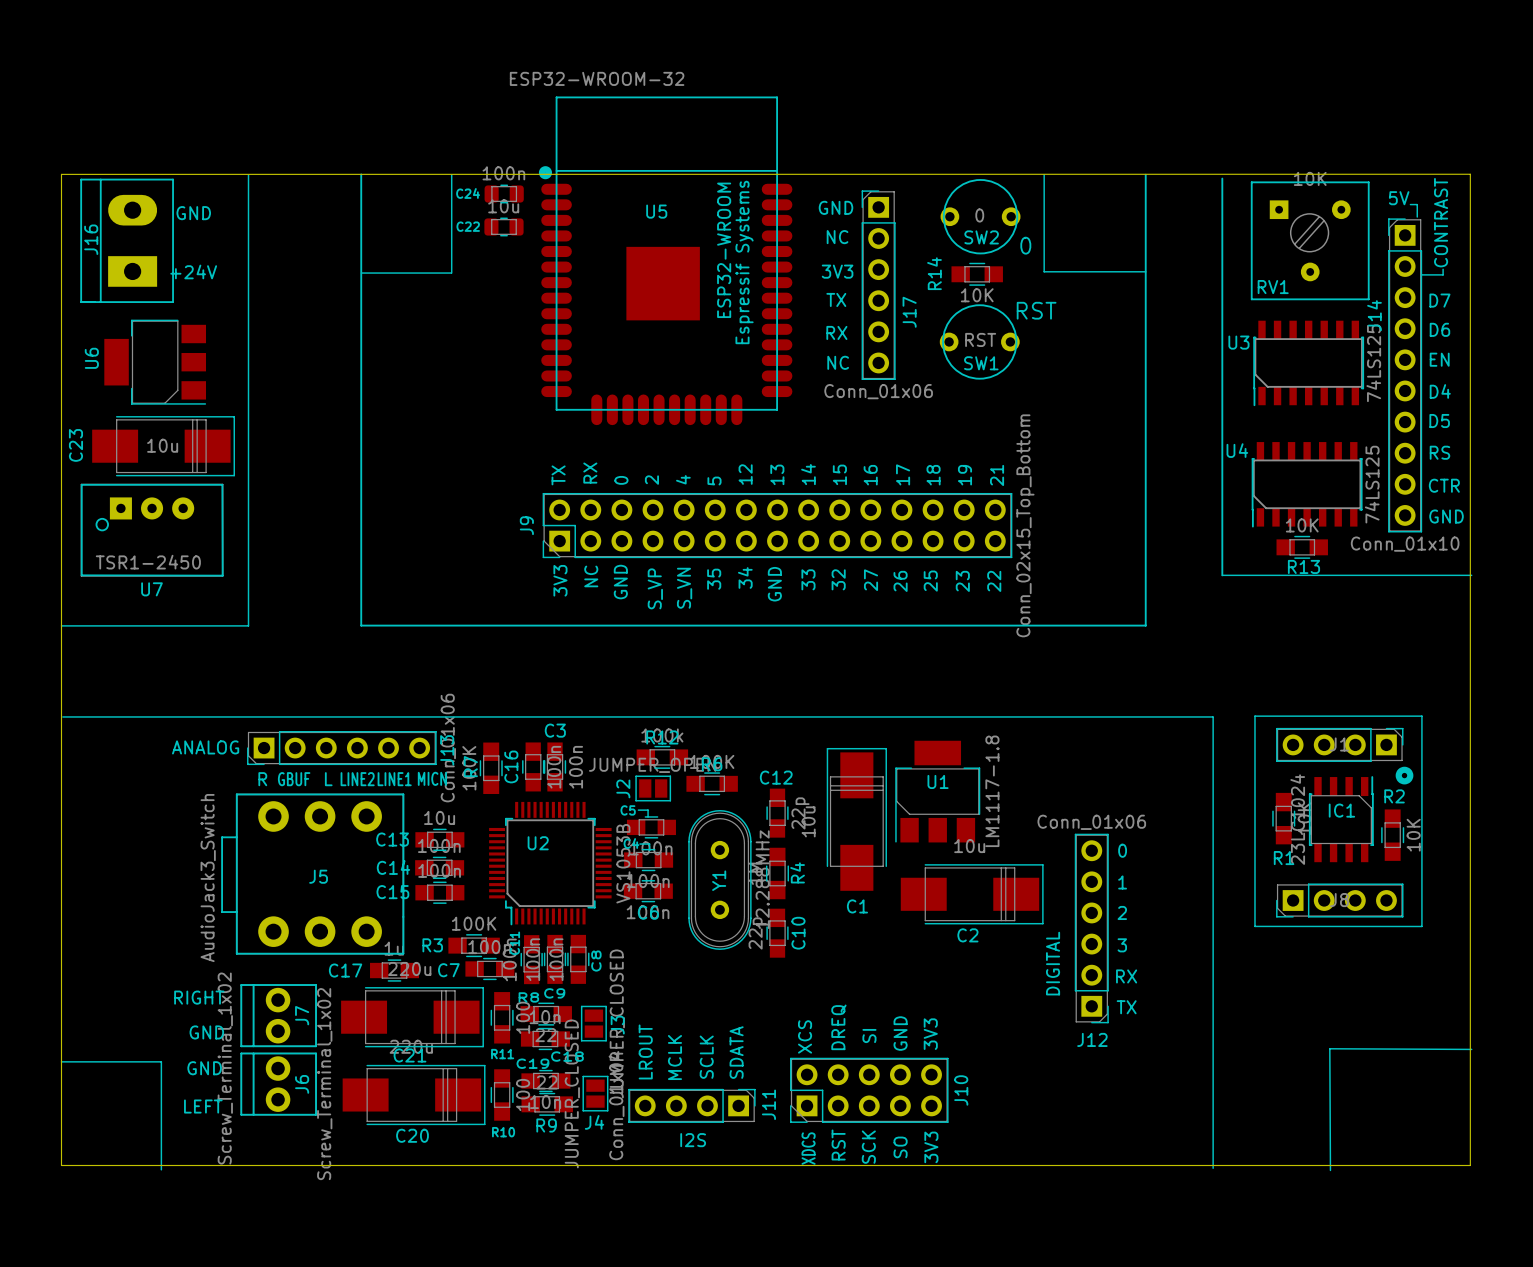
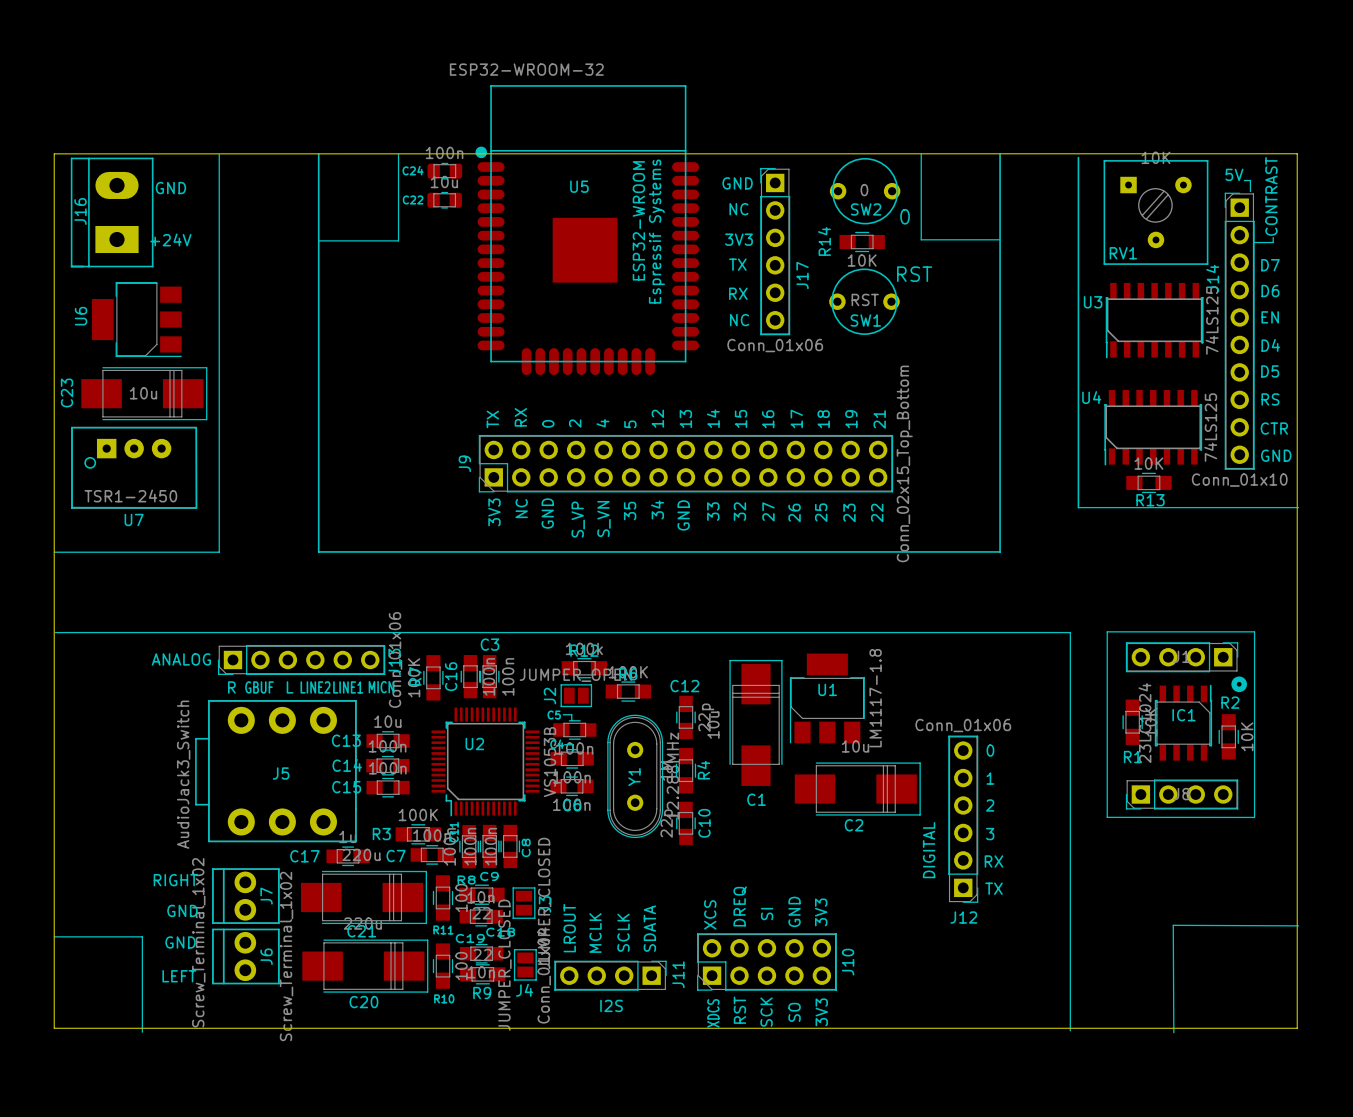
line: (1145, 174) (1145, 625) -> none
line: (1133, 271) (1145, 271) -> none
line: (1133, 625) (1145, 625) -> (1000, 551) (1000, 154)

